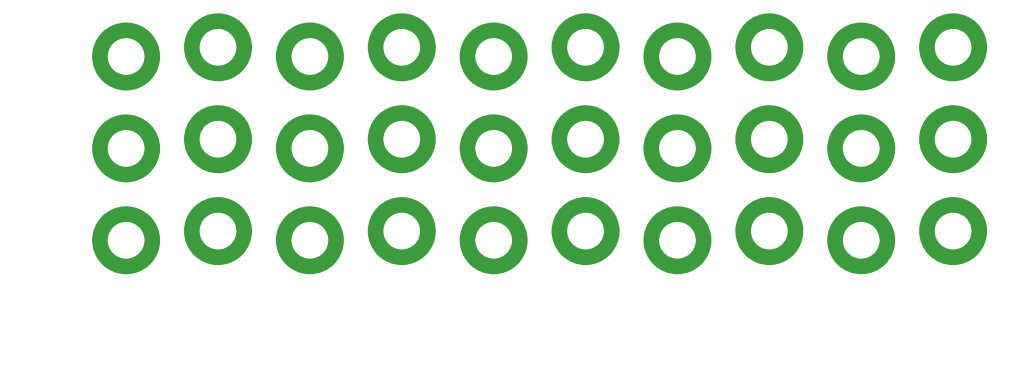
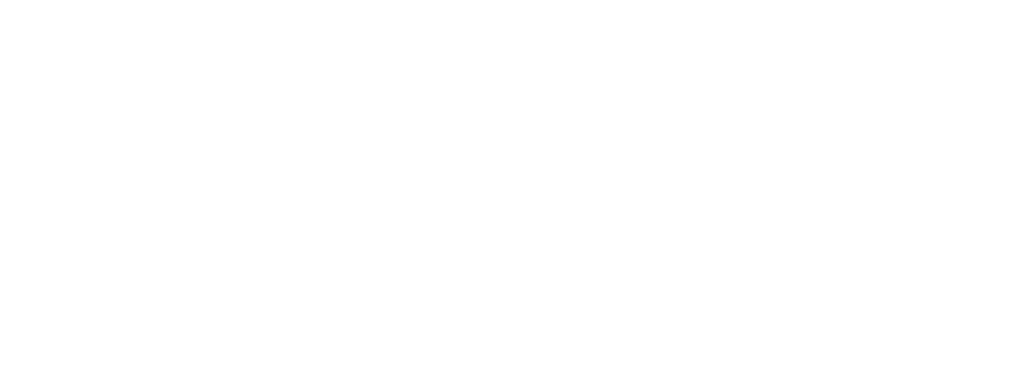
part: (539, 51) -> none
part: (539, 143) -> none
part: (539, 235) -> none

